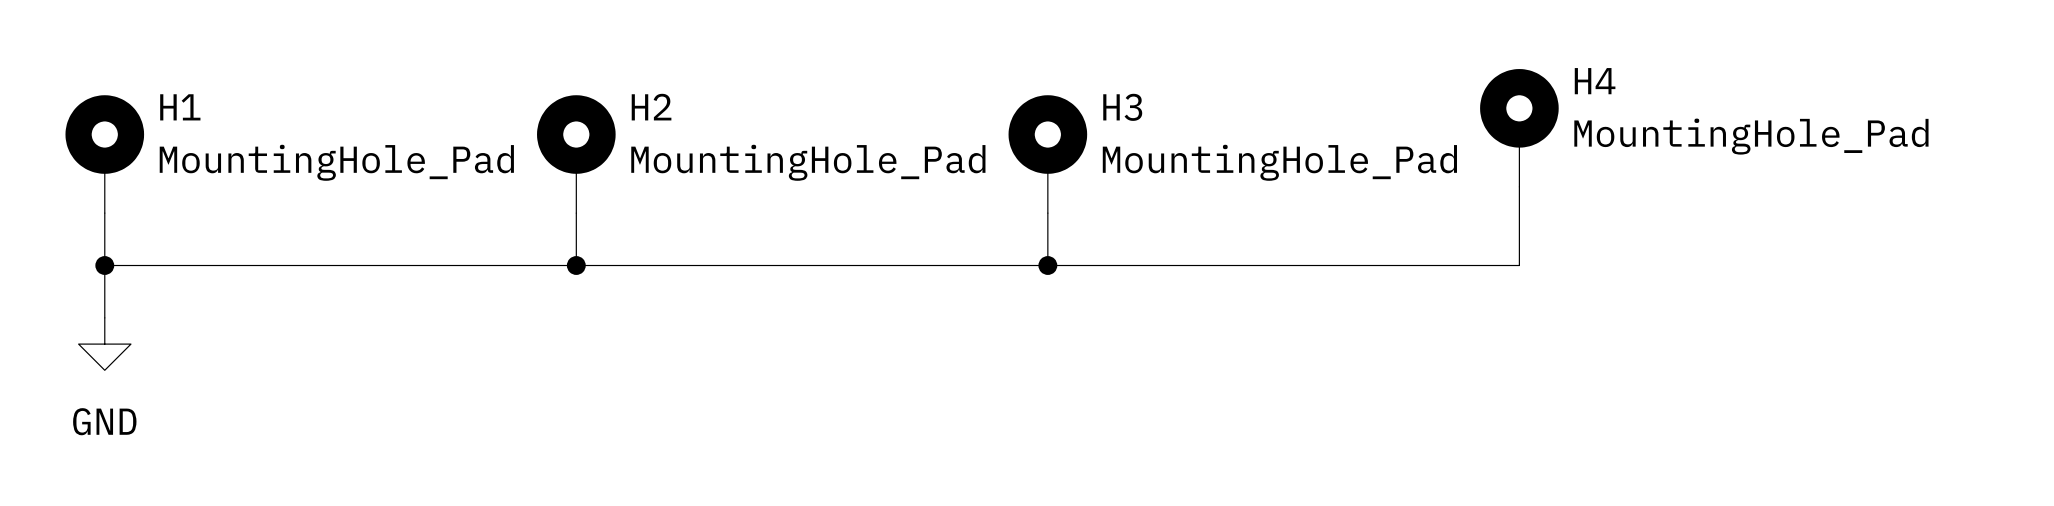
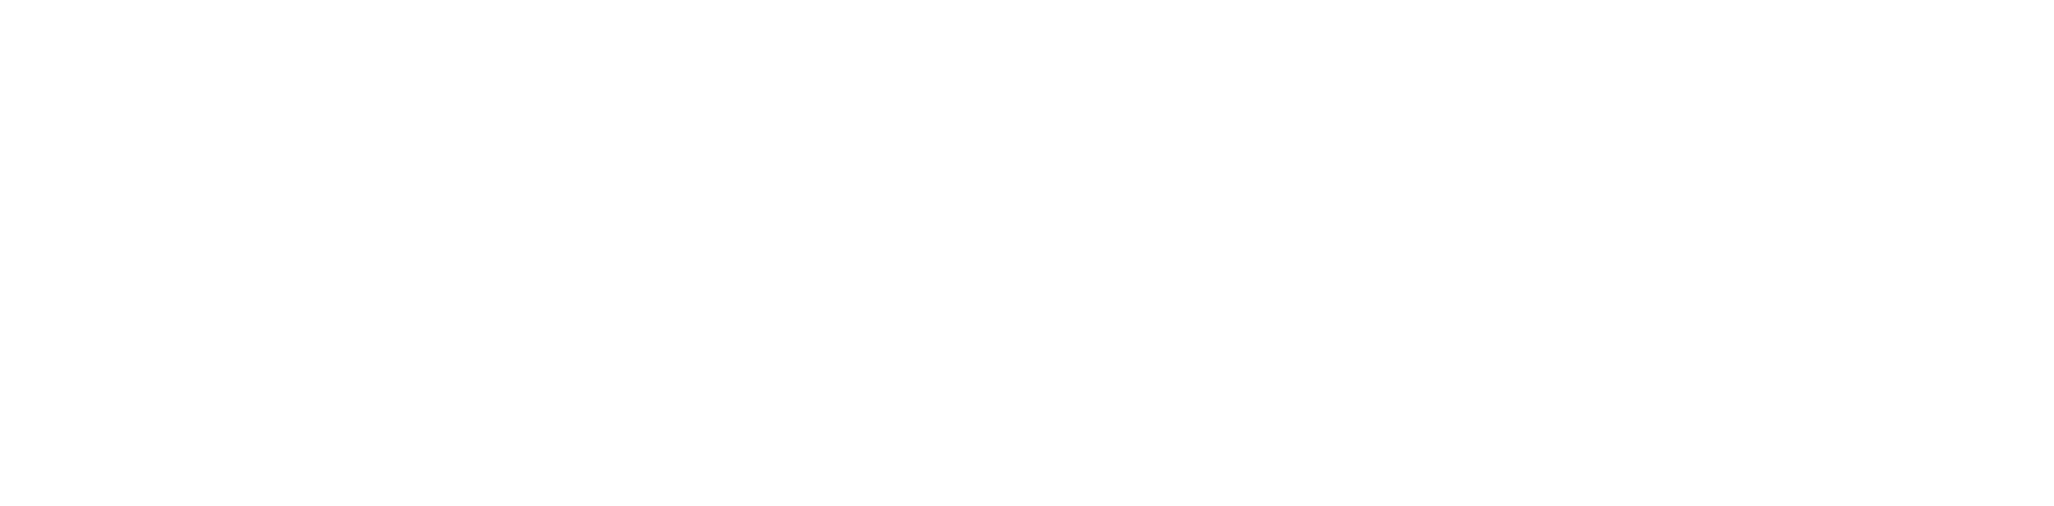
H4: MountingHole_Pad (1519, 127) -> none
H1: MountingHole_Pad (104, 154) -> none
H2: MountingHole_Pad (576, 154) -> none
H3: MountingHole_Pad (1047, 154) -> none
wire: (1519, 186) (1519, 265) (104, 265) -> none
wire: (104, 213) (104, 317) -> none
wire: (576, 213) (576, 265) -> none
wire: (1047, 213) (1047, 265) -> none
junction: (104, 265) -> none
junction: (576, 265) -> none
junction: (1047, 265) -> none
power symbol: GND (104, 344) -> none

